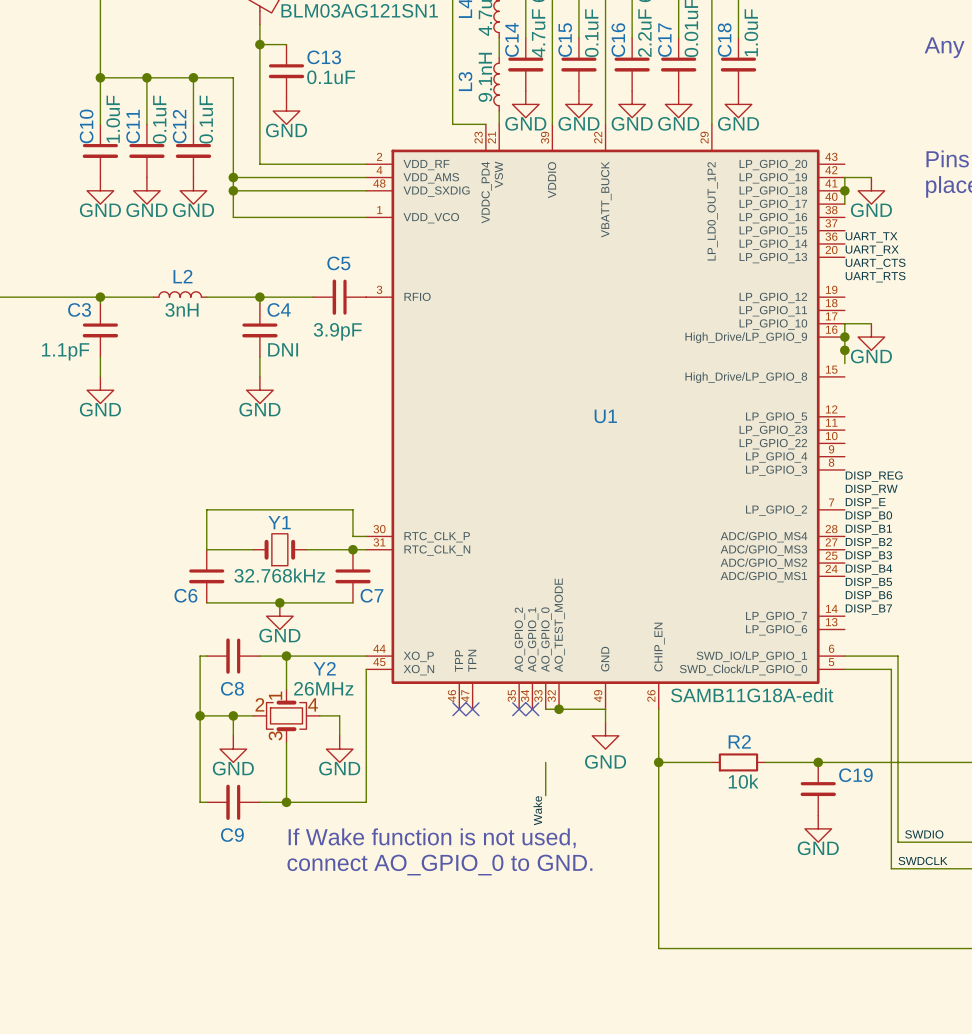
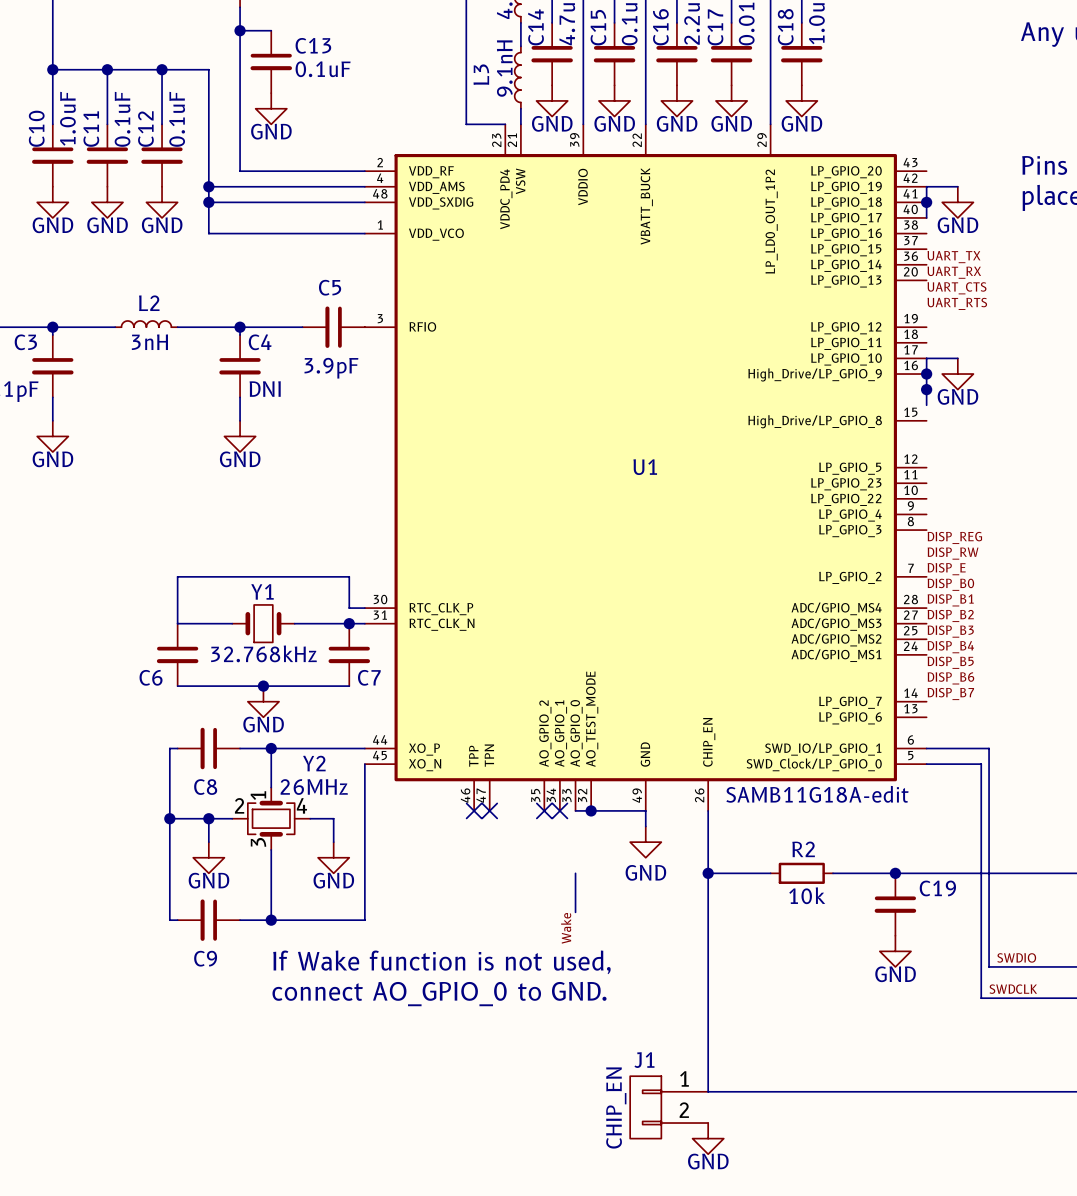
J1: none -> CHIP_EN (669, 1107)
power symbol: none -> GND (708, 1138)

